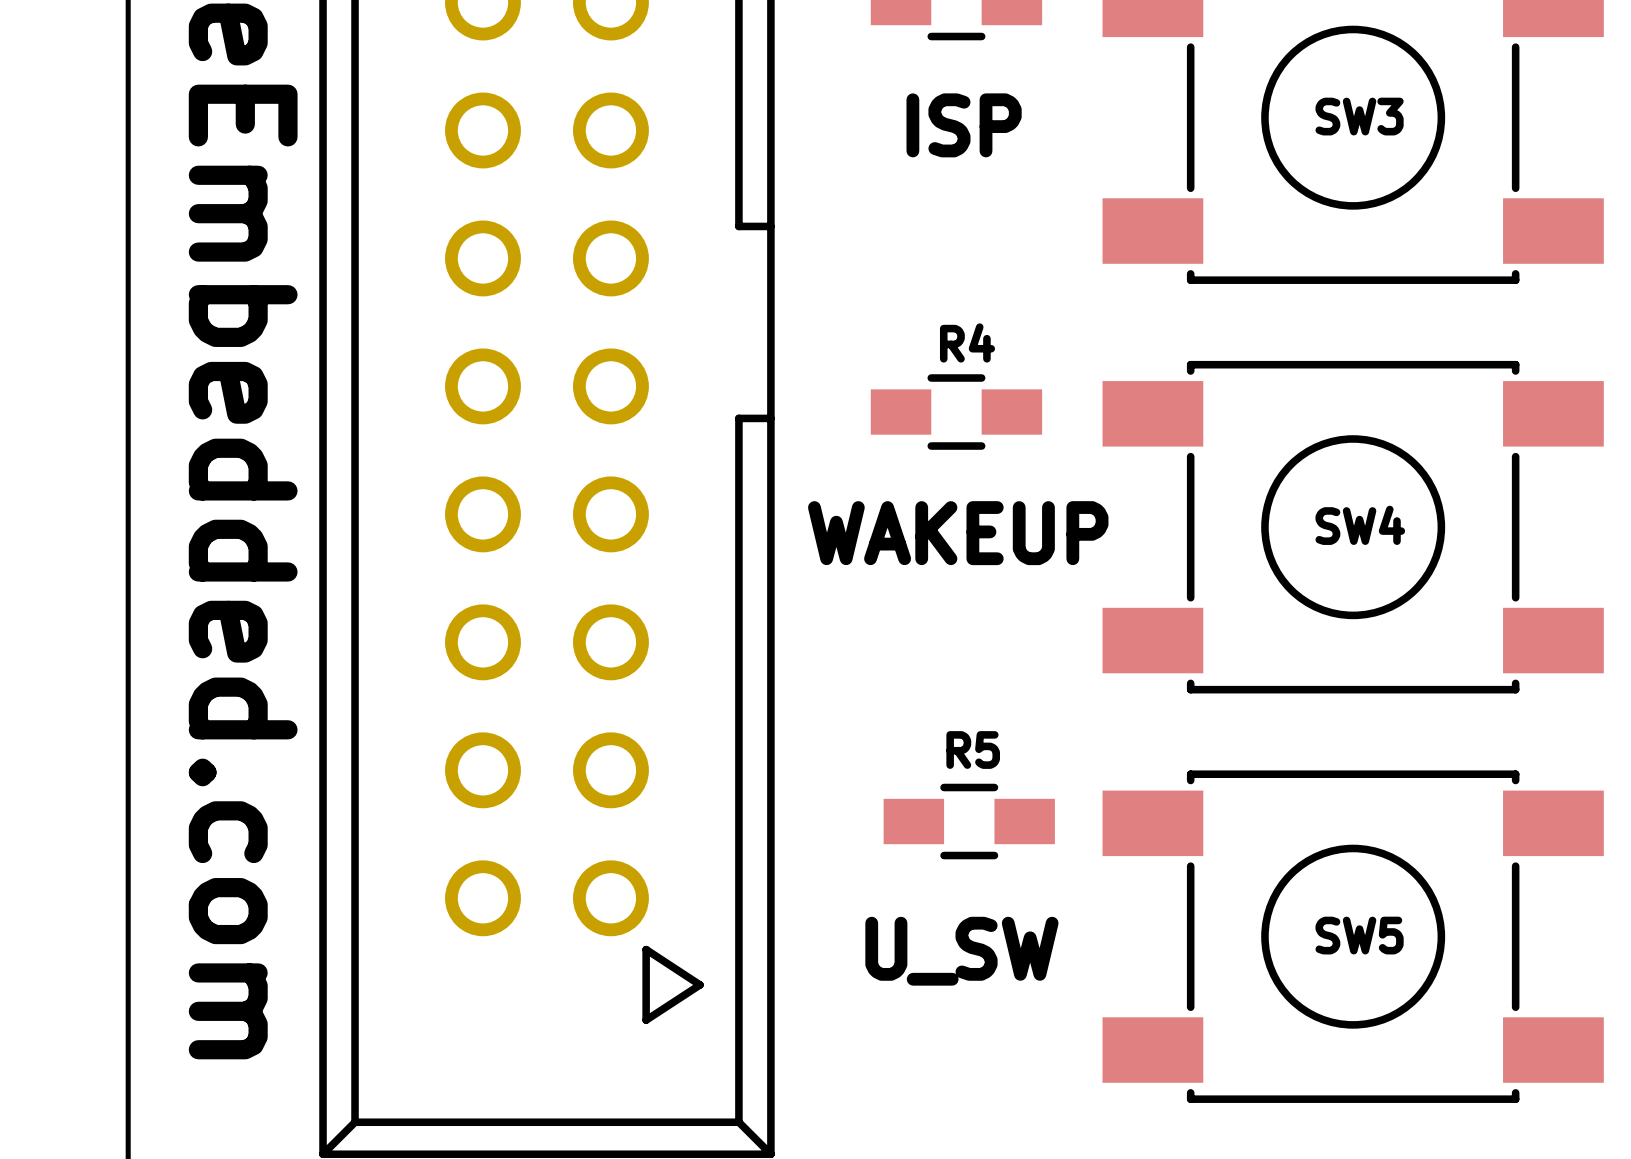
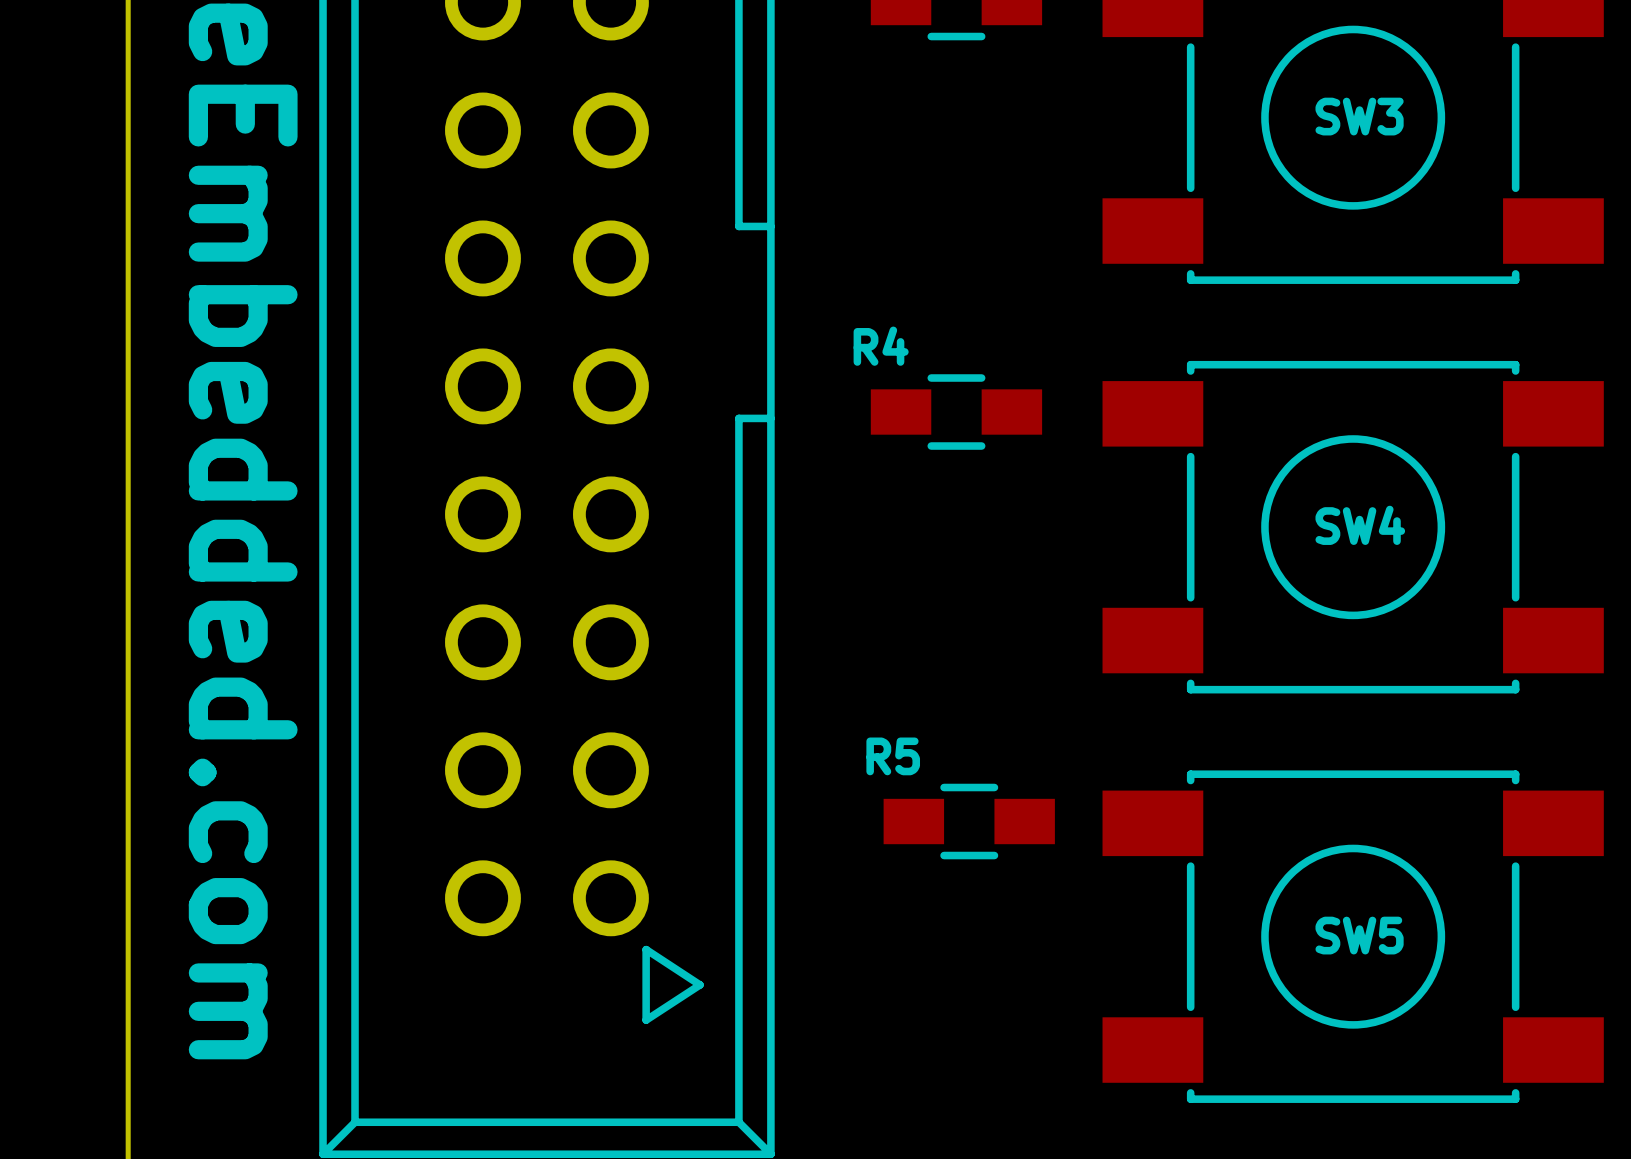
text: ISP (964, 125) -> none
R4 name position: R4 (967, 342) -> R4 (881, 346)
text: WAKEUP (958, 533) -> none
R5 name position: R5 (973, 750) -> R5 (893, 756)
text: U_SW (961, 951) -> none

